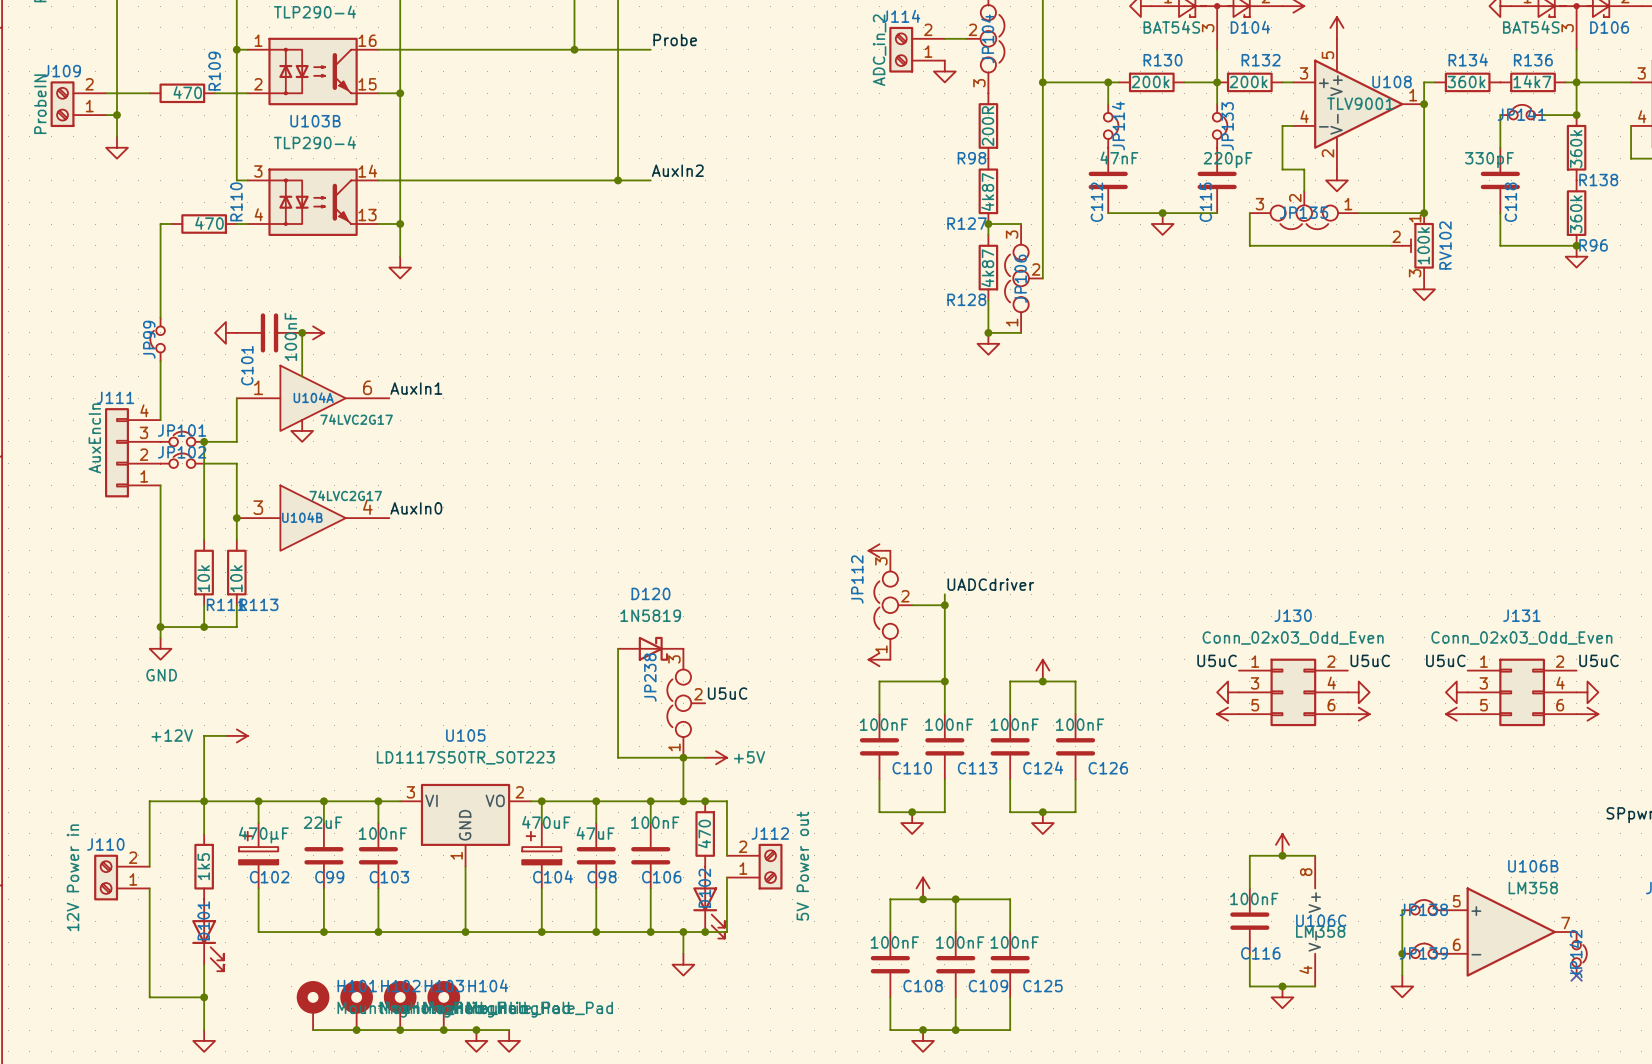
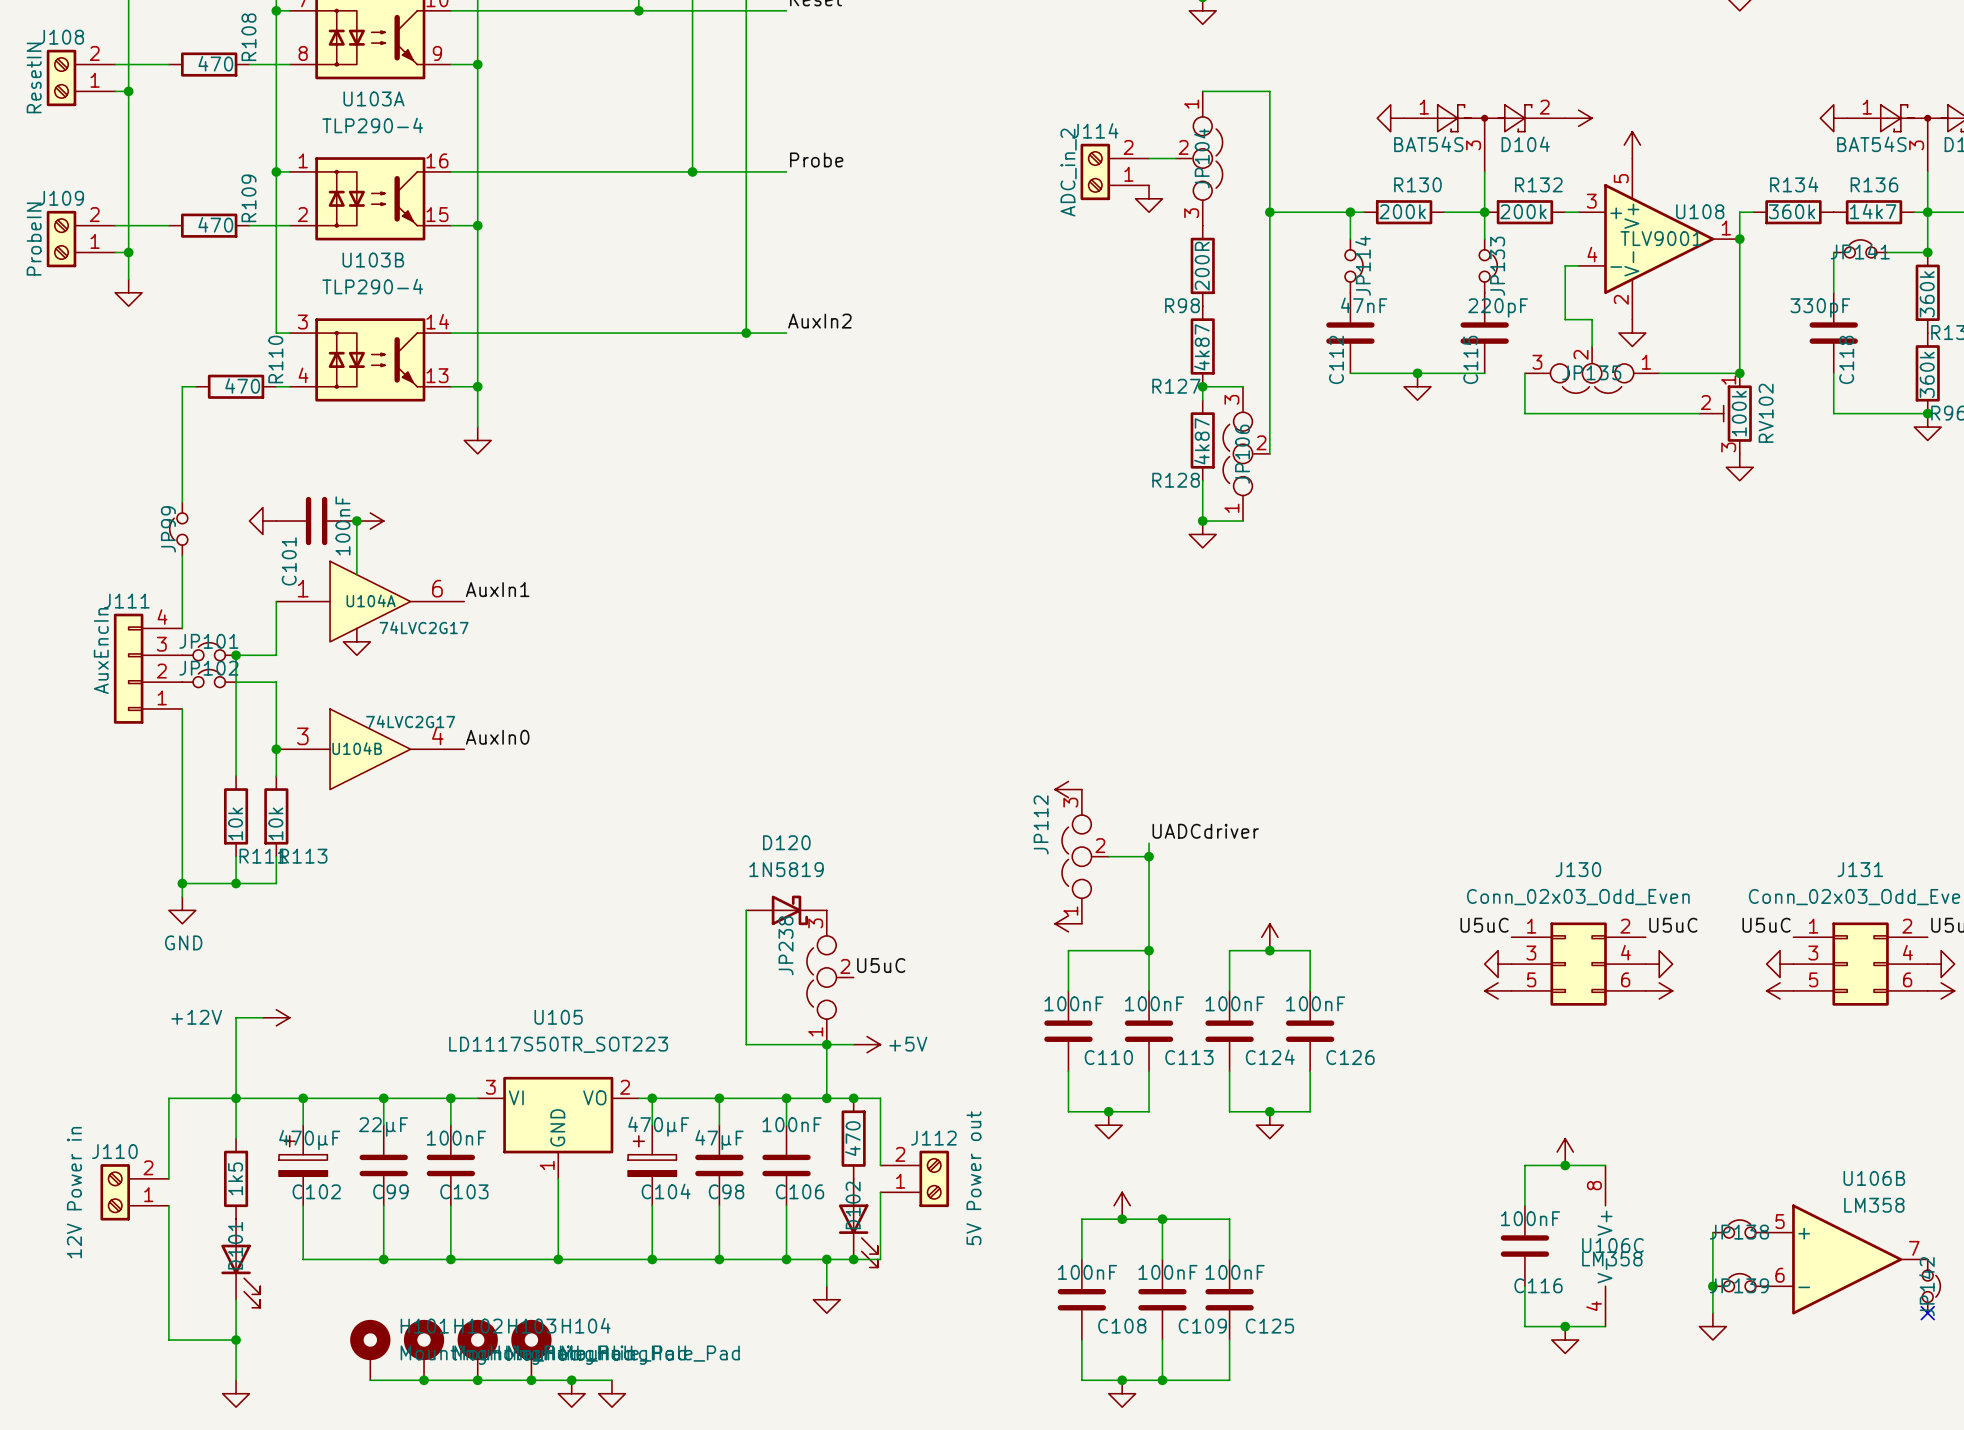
C99 value: 22uF (323, 822) -> 22µF (383, 1126)
C104 value: 470uF (546, 822) -> 470µF (658, 1126)
C98 value: 47uF (595, 833) -> 47µF (719, 1140)

